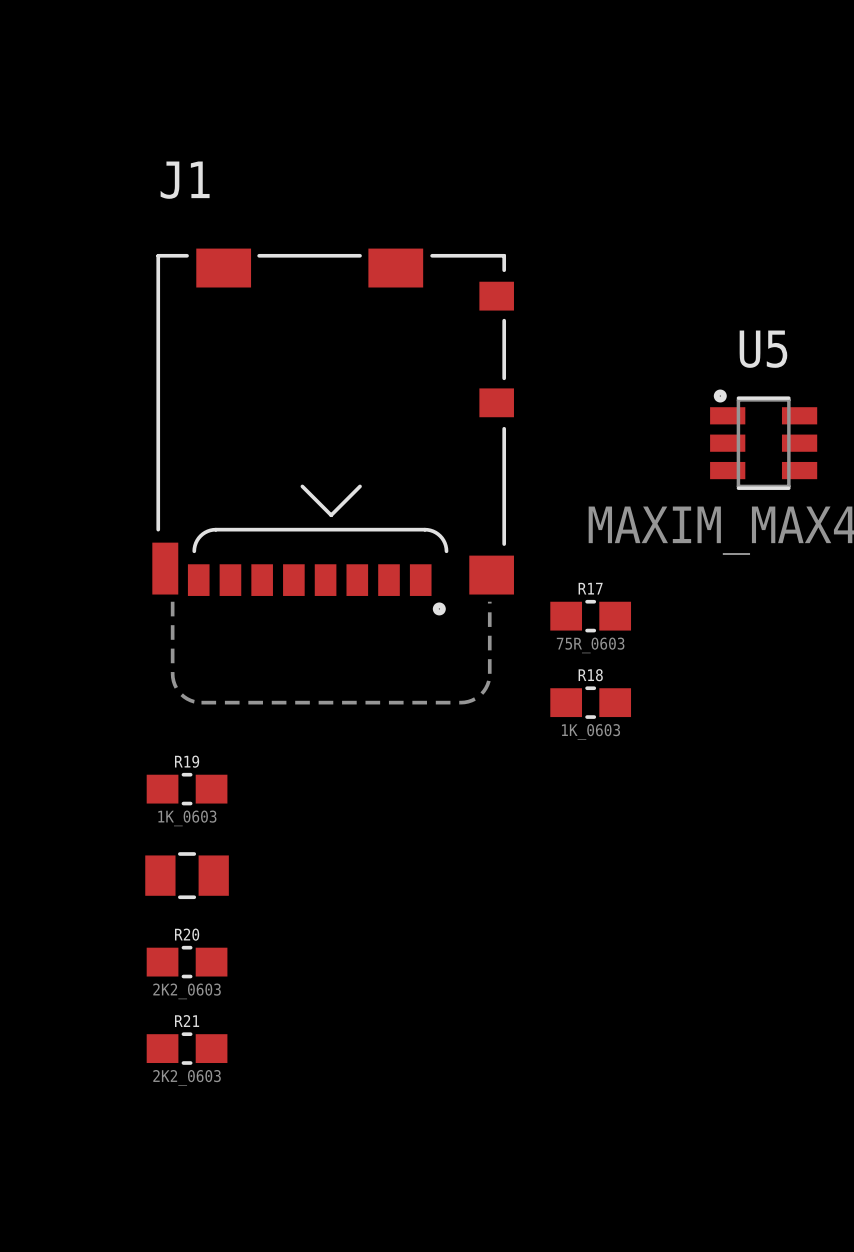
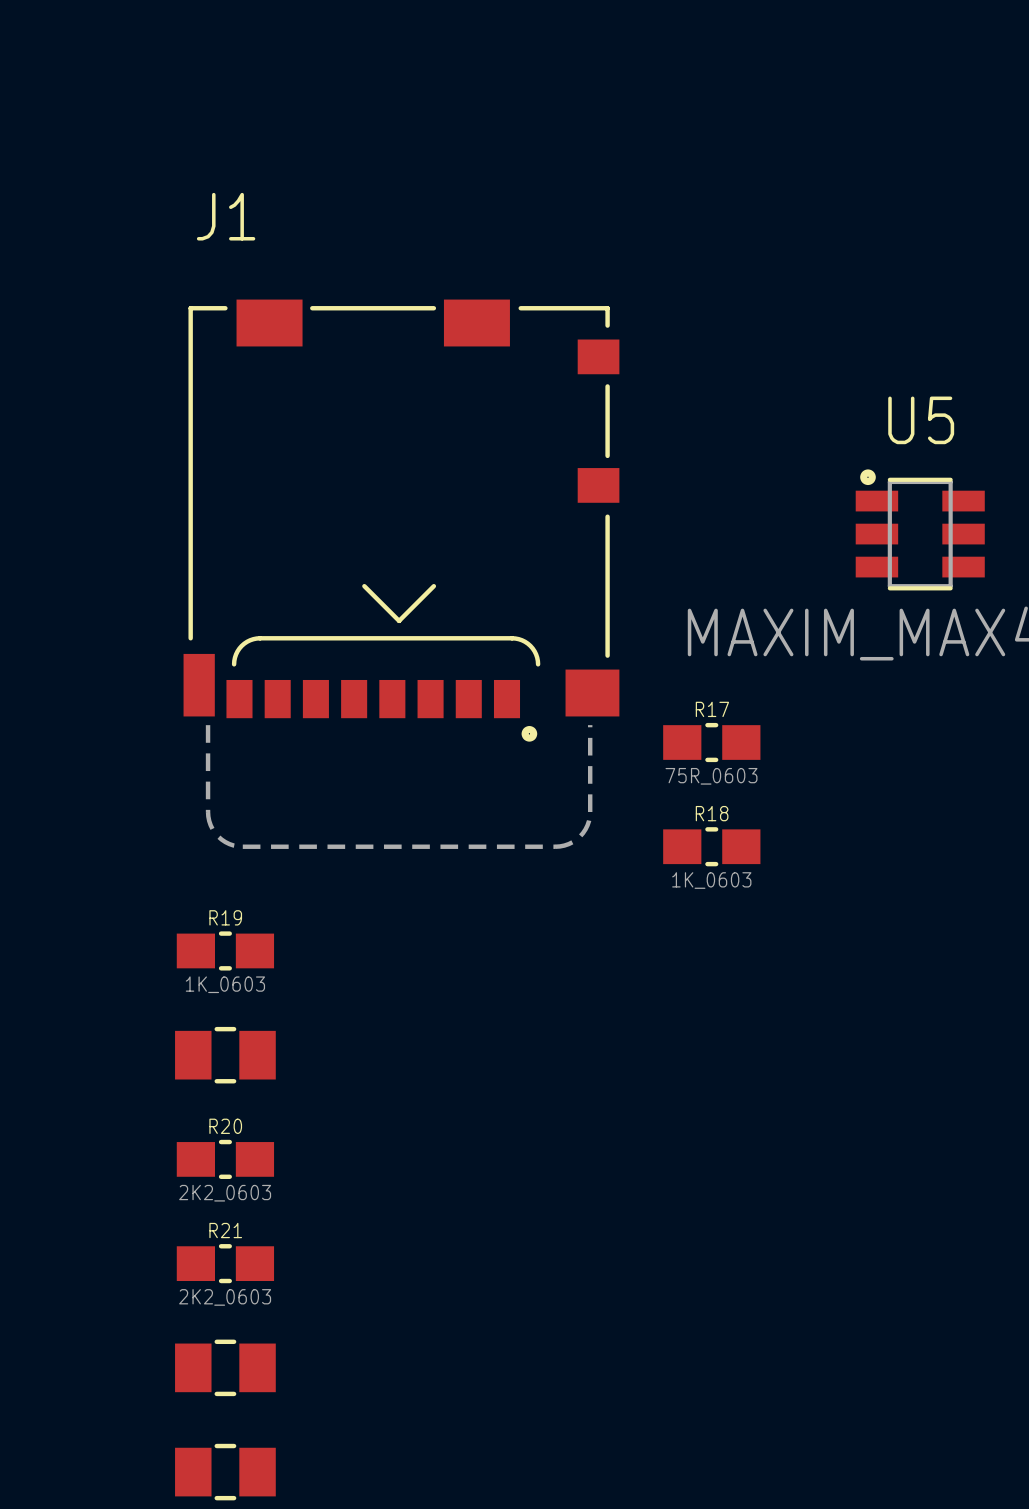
part: none -> (225, 1367)
part: none -> (225, 1472)

